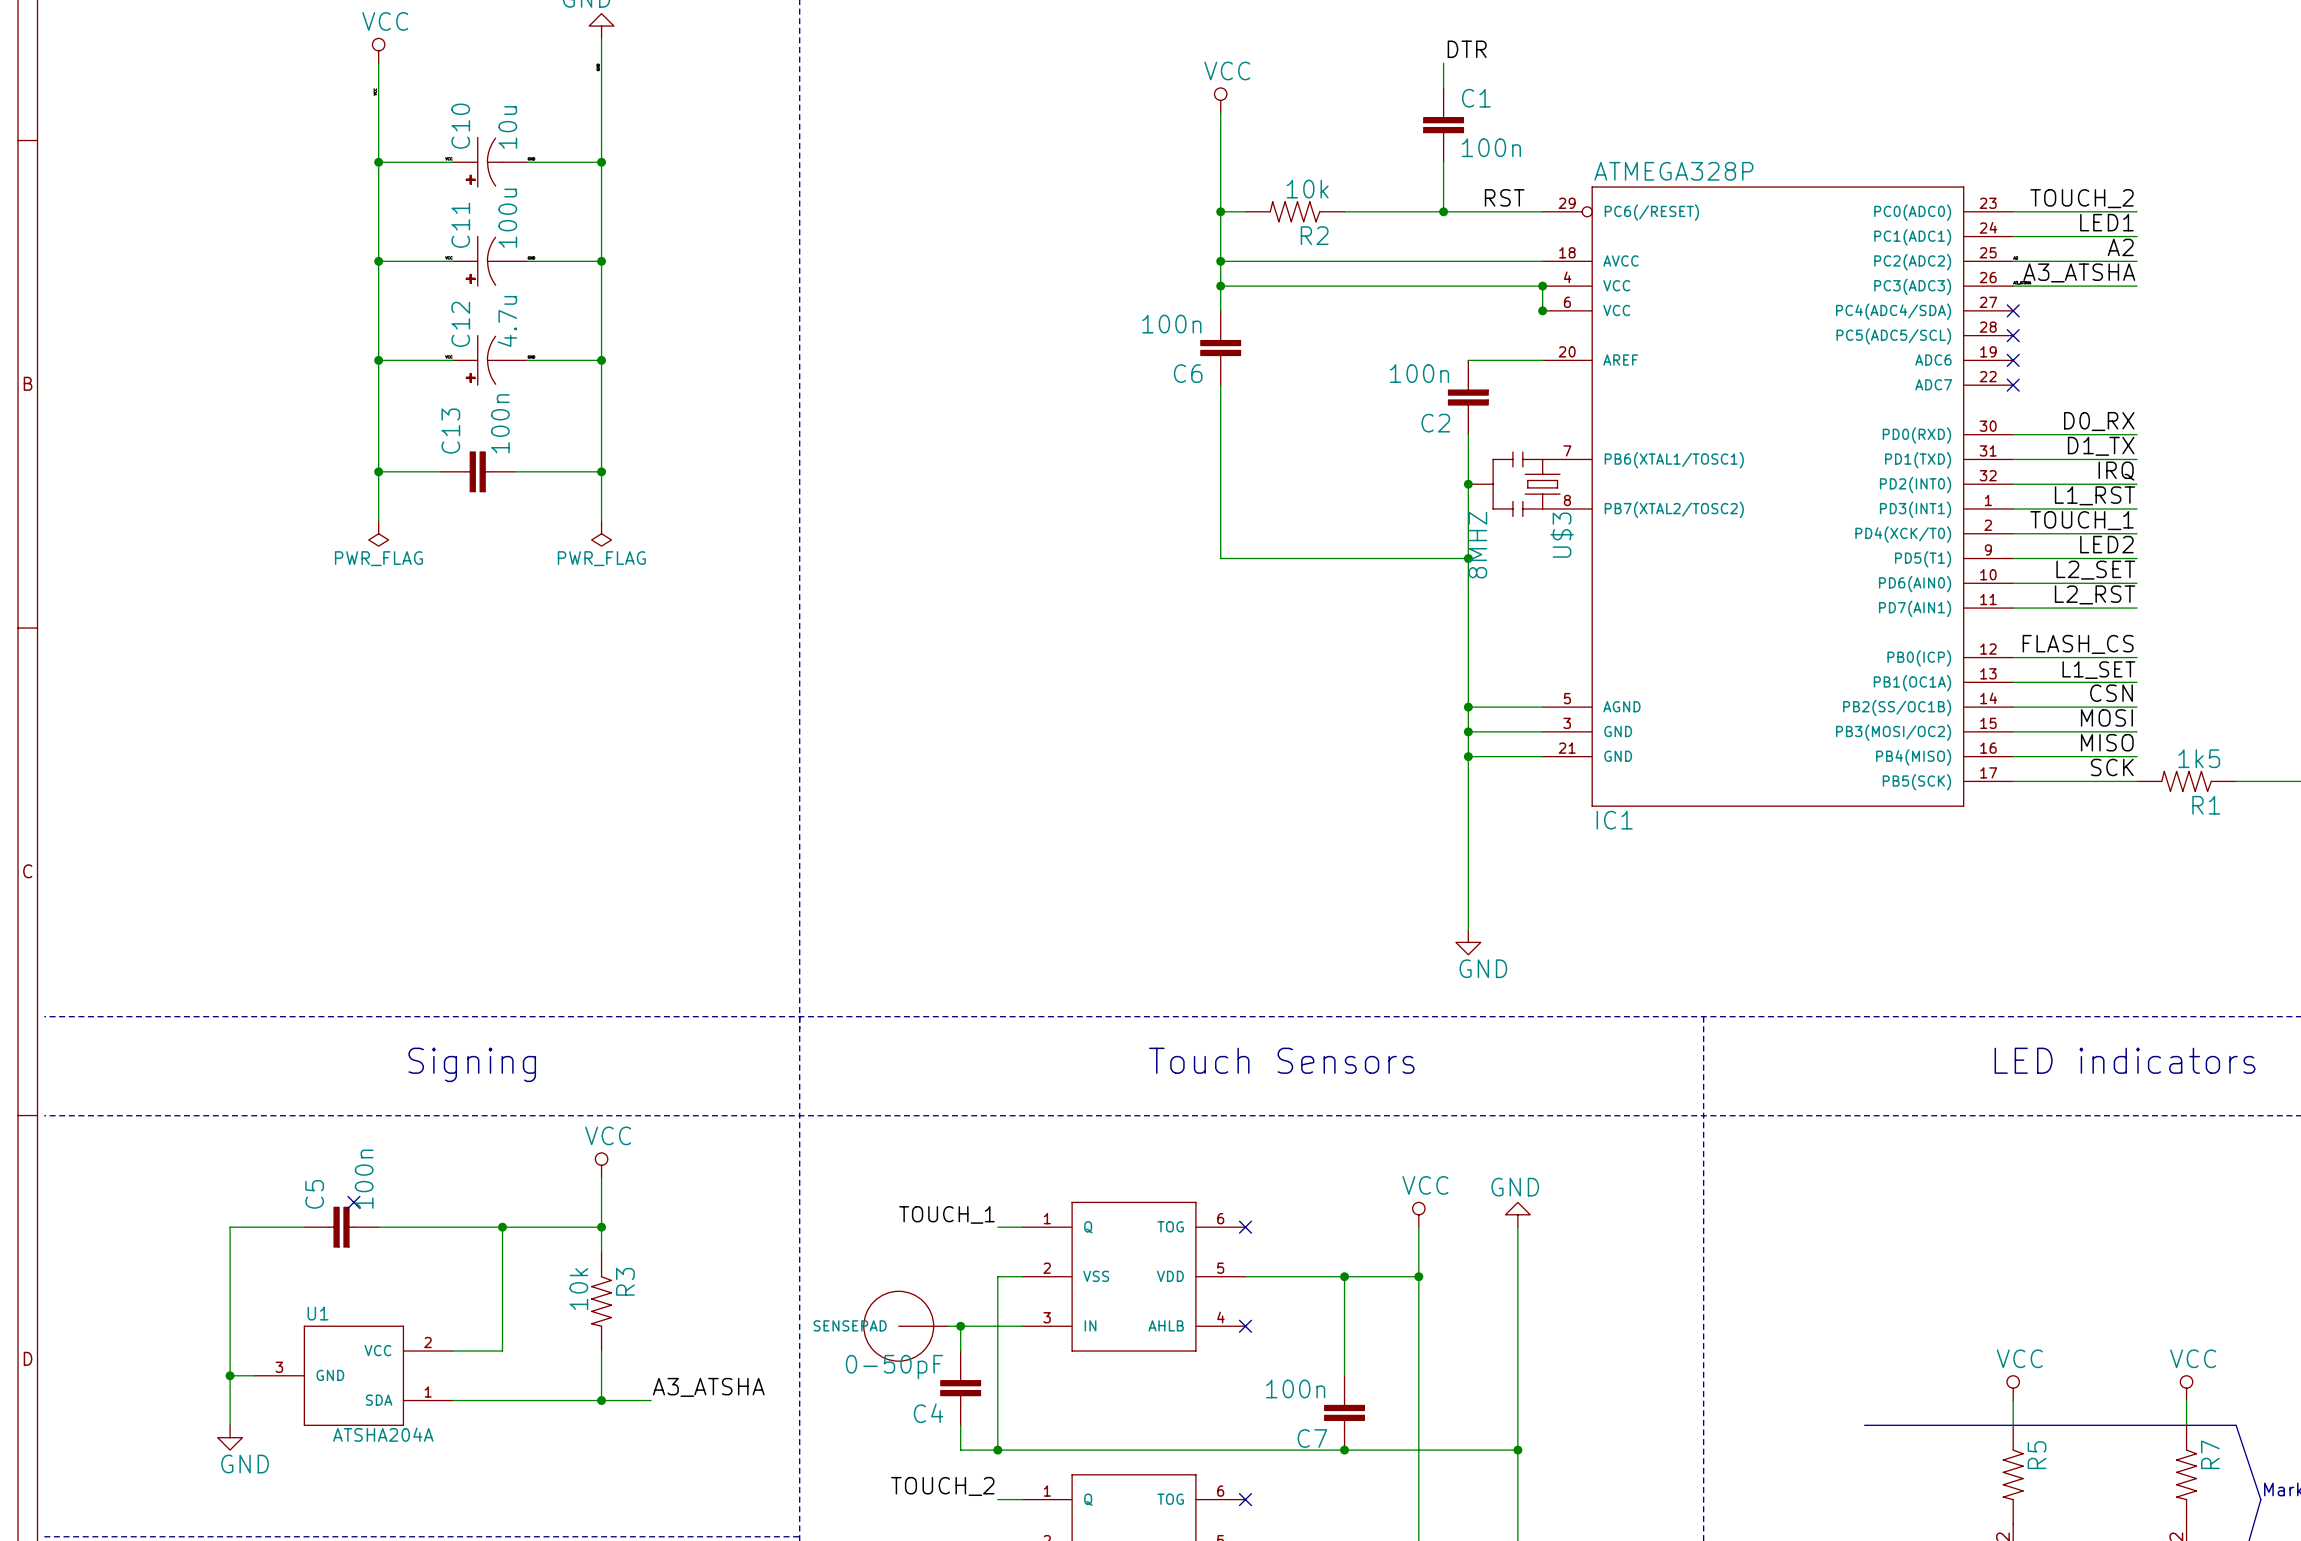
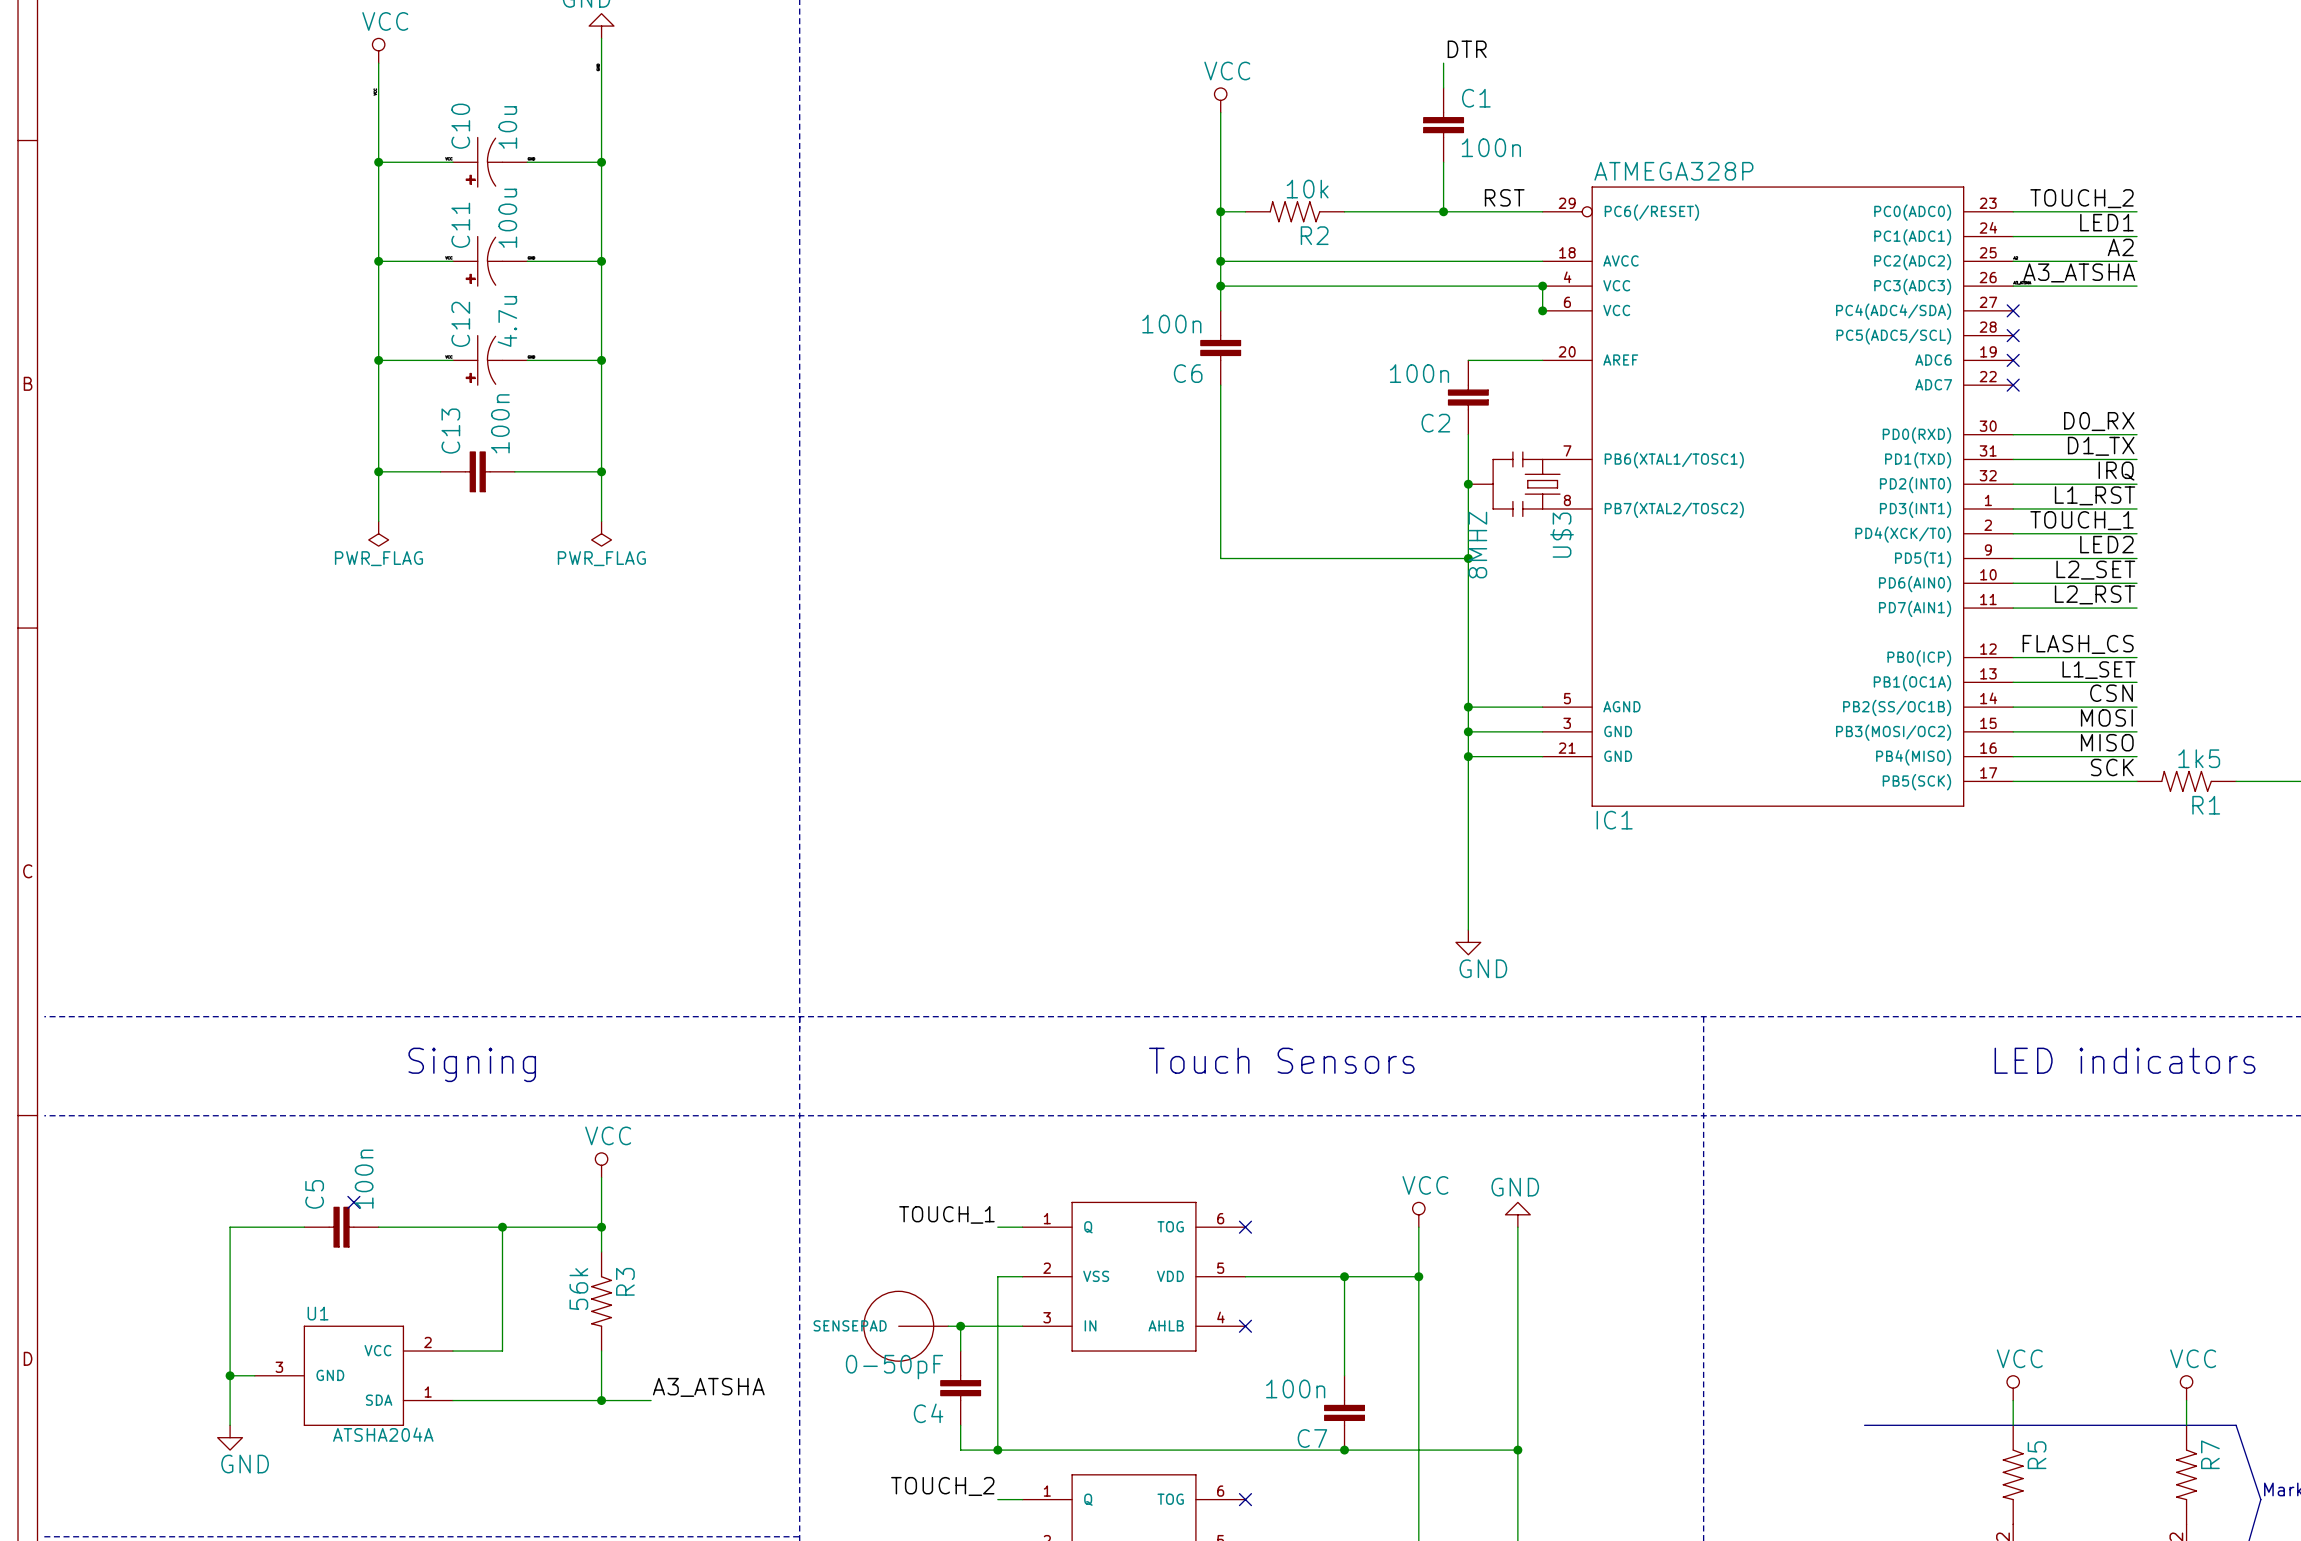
R3 value: 10k (578, 1289) -> 56k (578, 1289)

